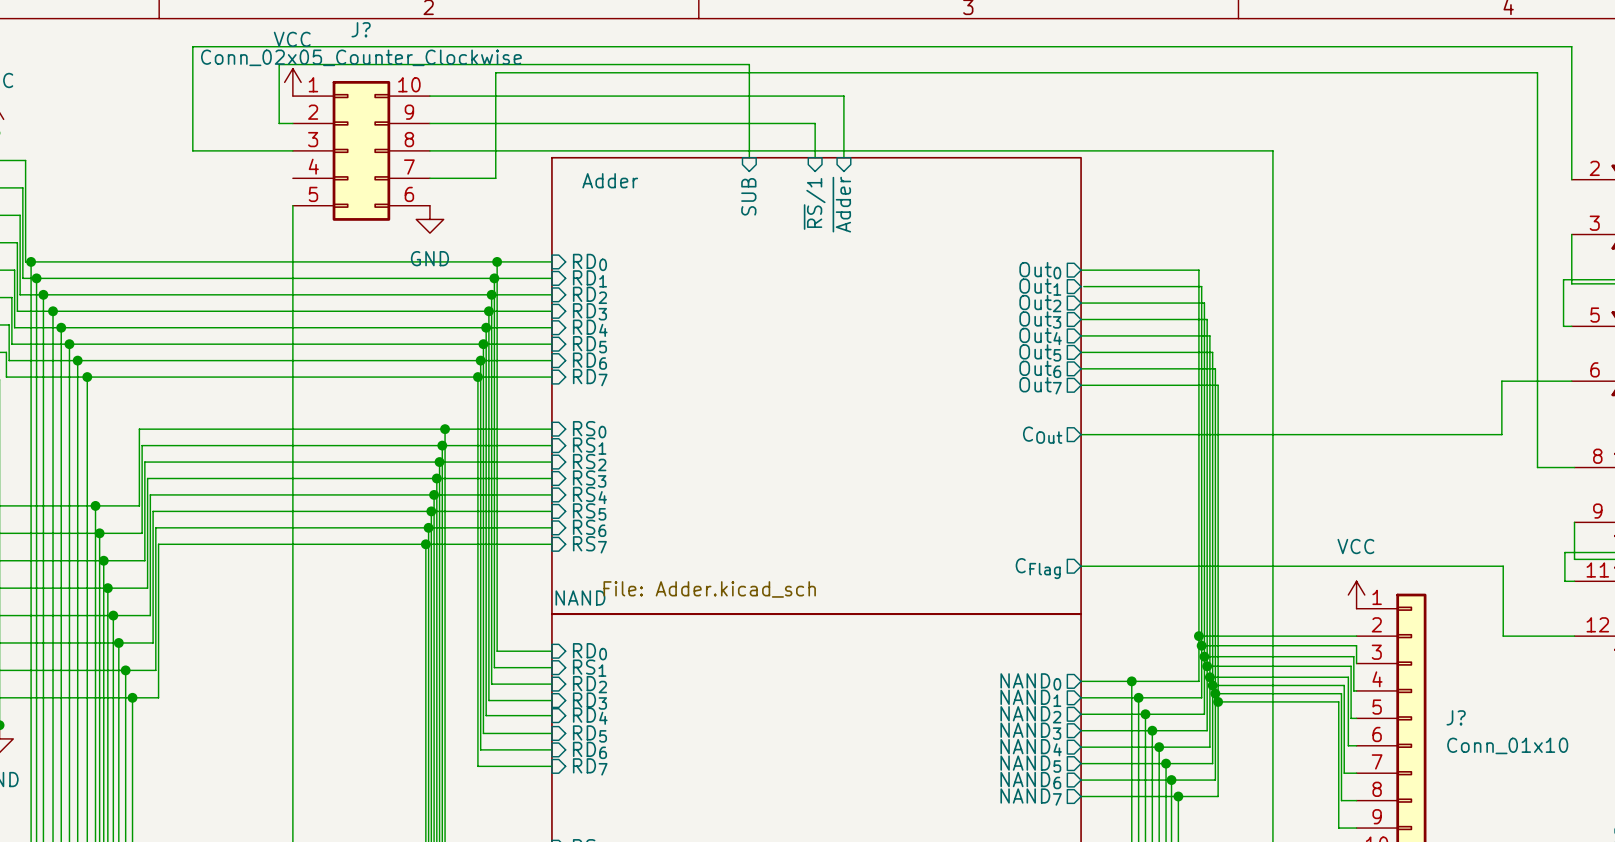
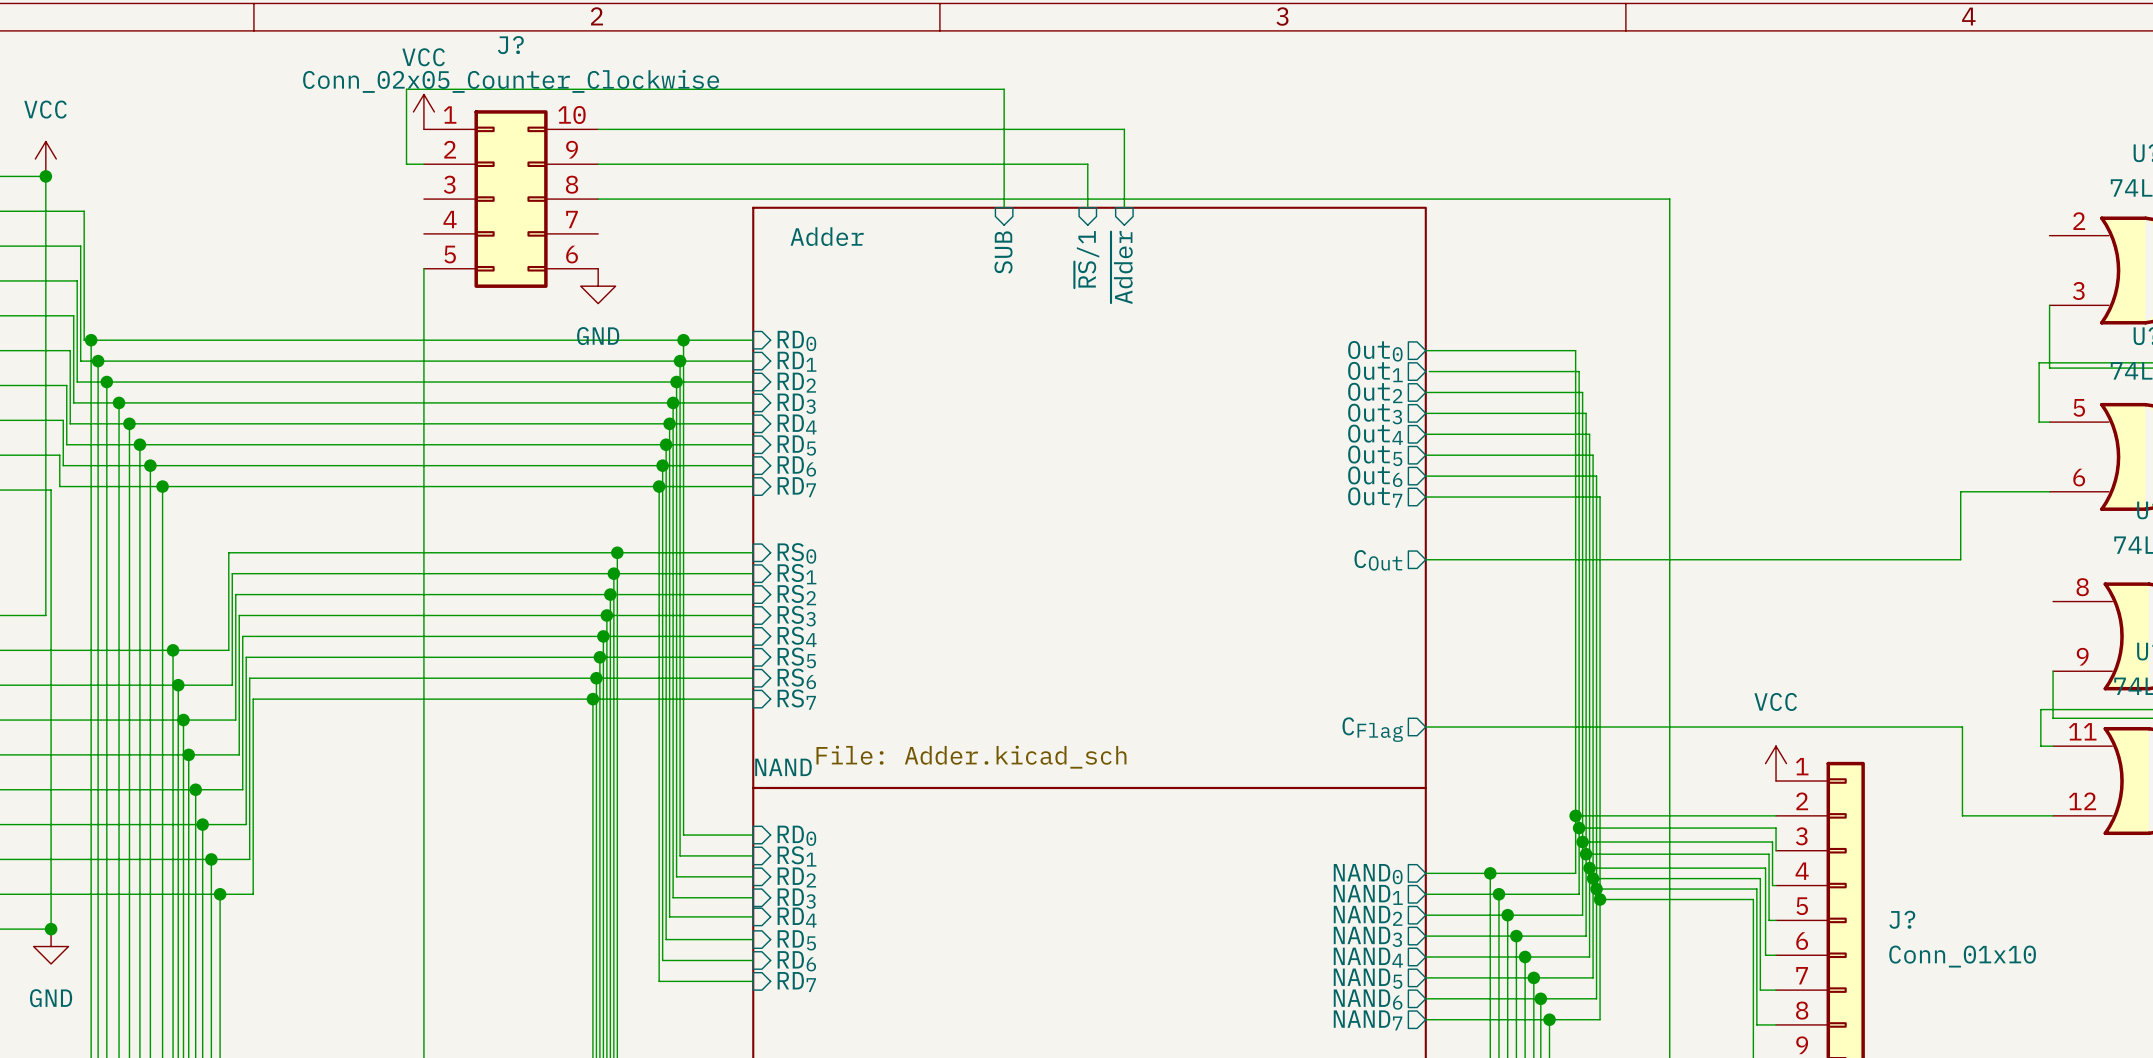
wire: (292, 150) (192, 150) (192, 46) (1571, 46) (1571, 179) -> none
wire: (429, 178) (495, 178) (495, 72) (1537, 72) (1537, 467) (1574, 467) -> none

